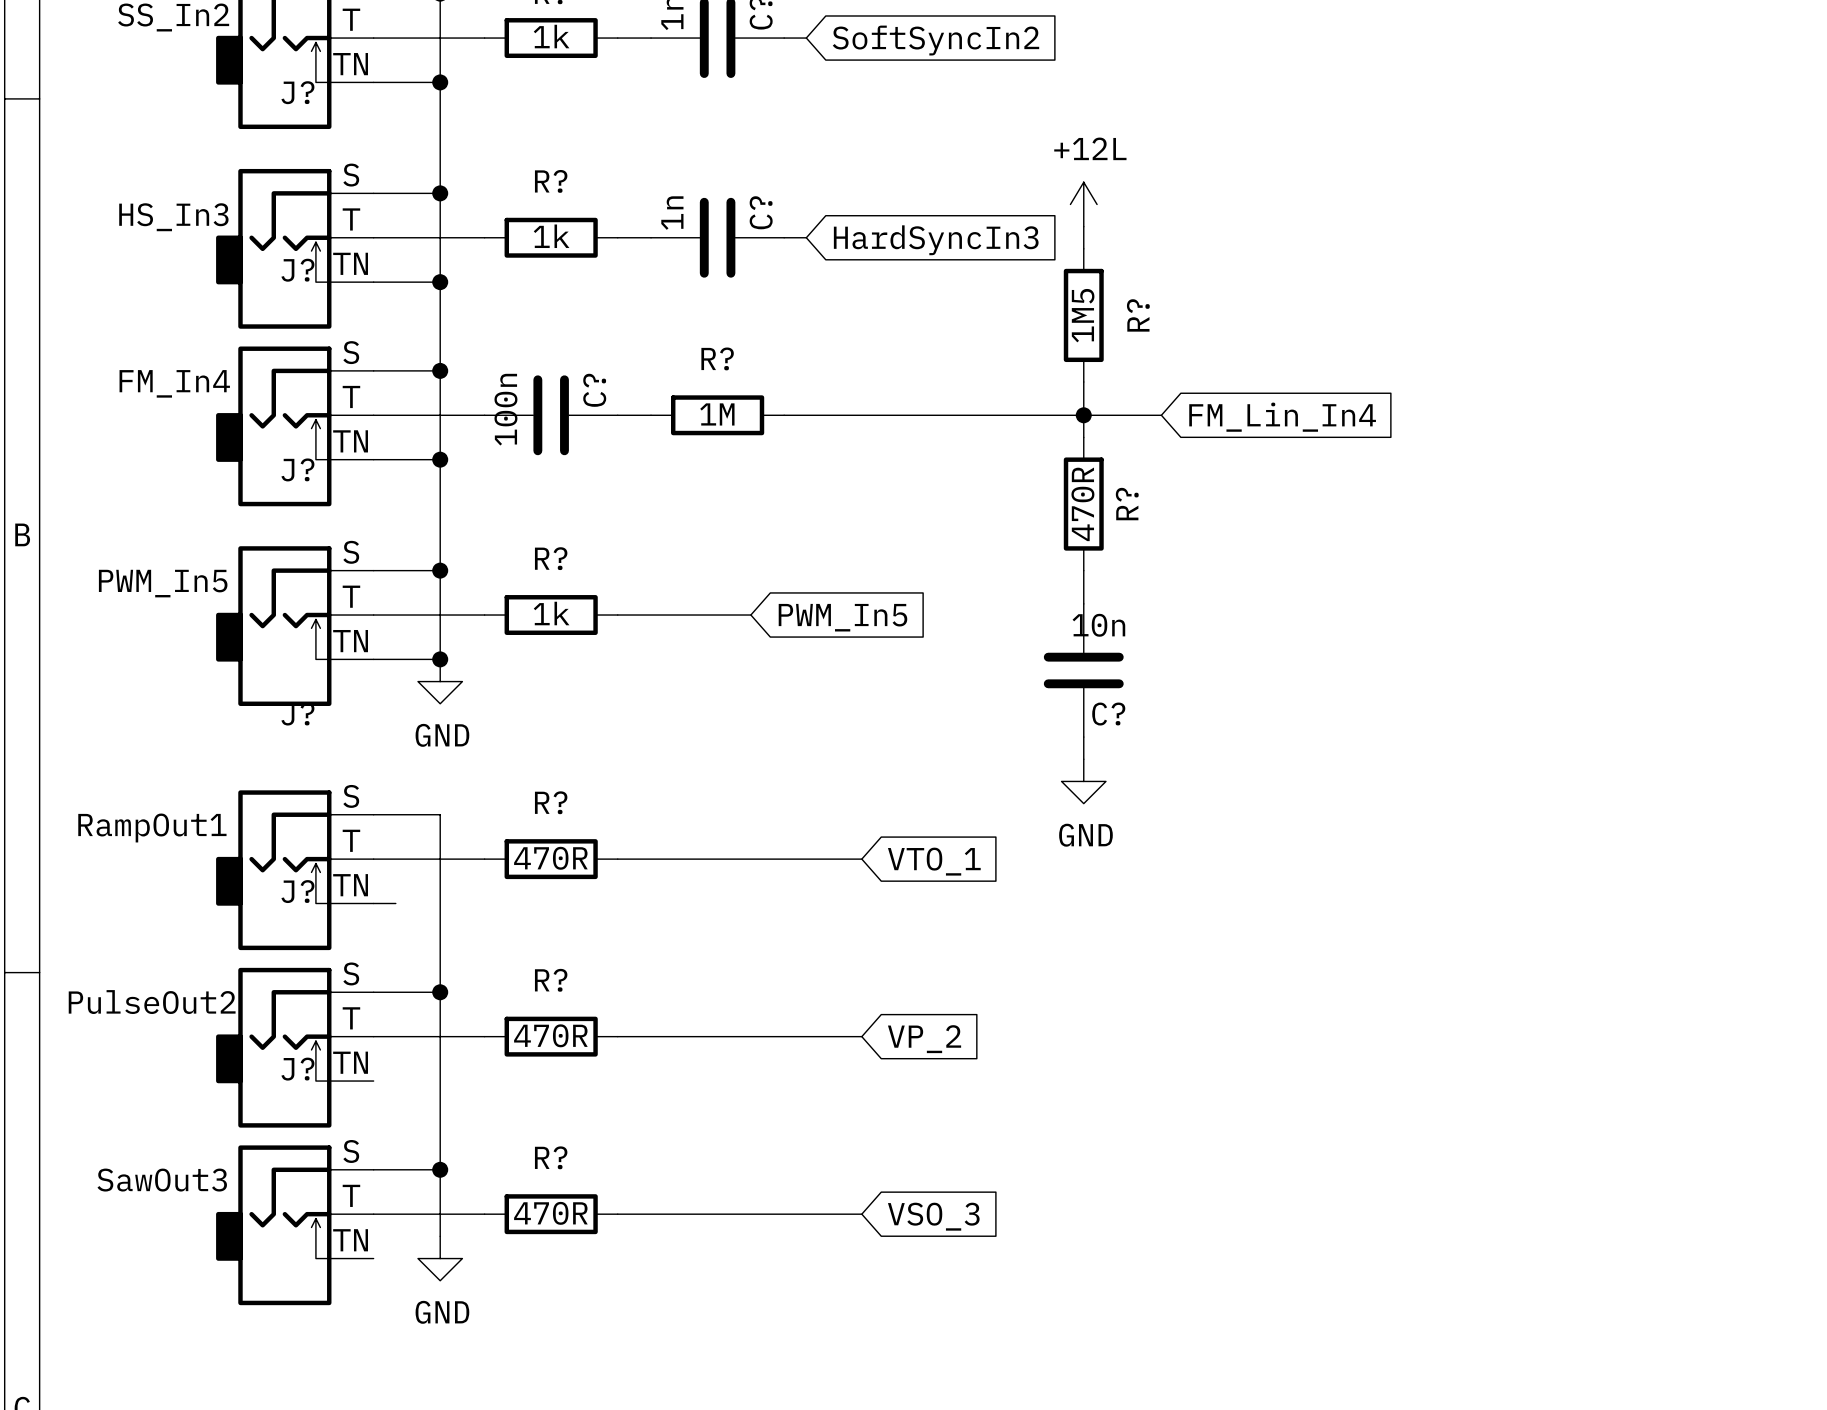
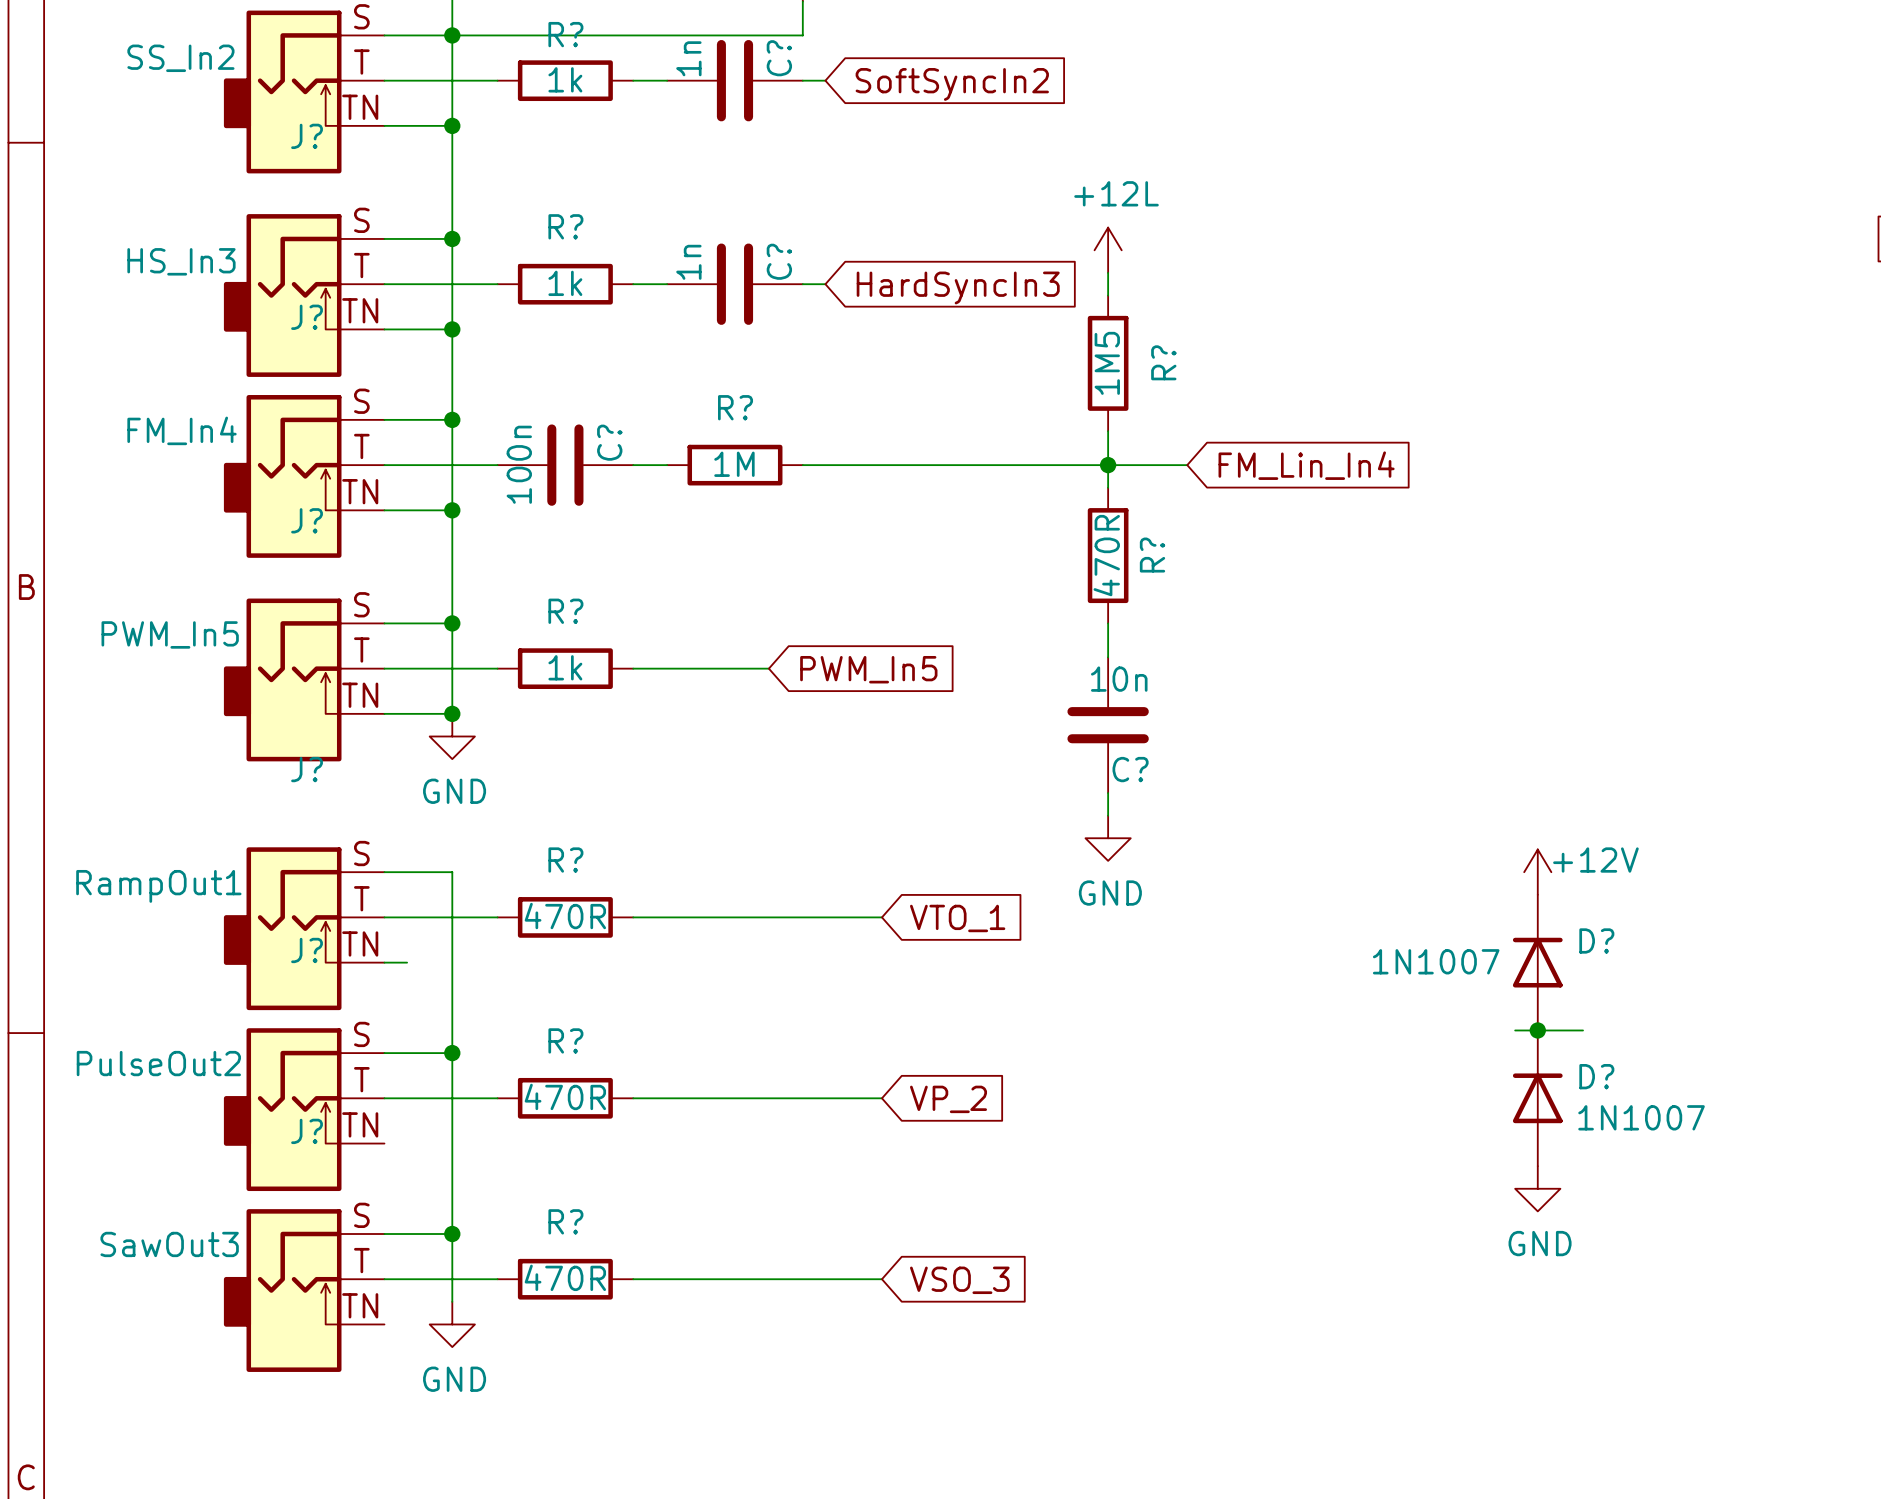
power symbol: none -> +12V (1537, 872)
D?: none -> 1N1007 (1537, 962)
wire: none -> (1515, 1030) (1583, 1030)
junction: none -> (1537, 1030)
D?: none -> 1N1007 (1537, 1098)
power symbol: none -> GND (1537, 1188)

